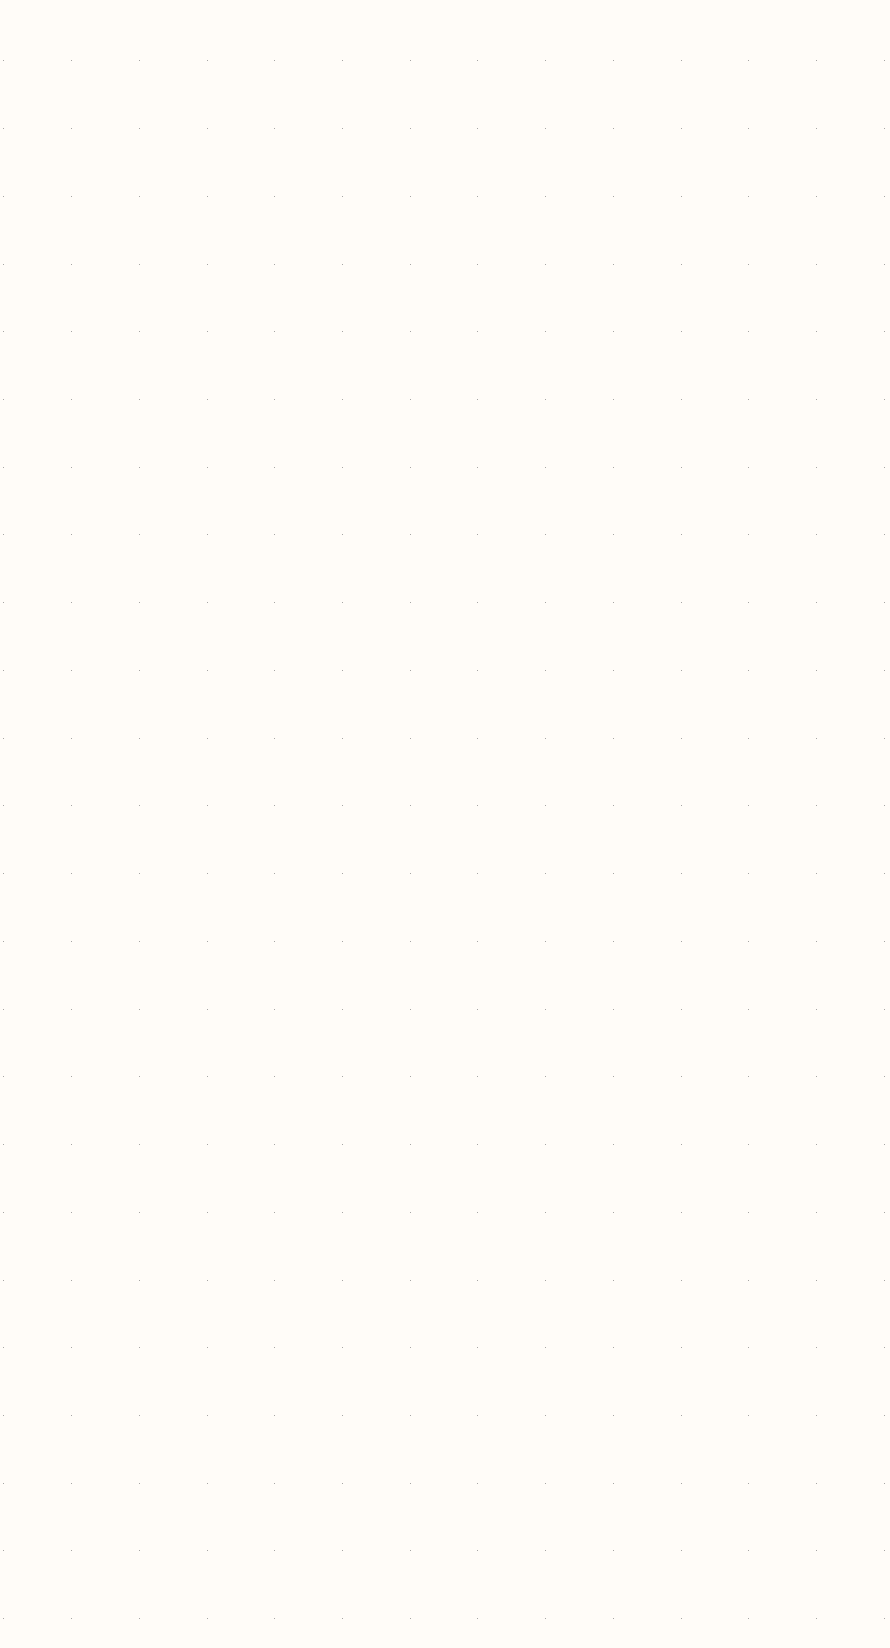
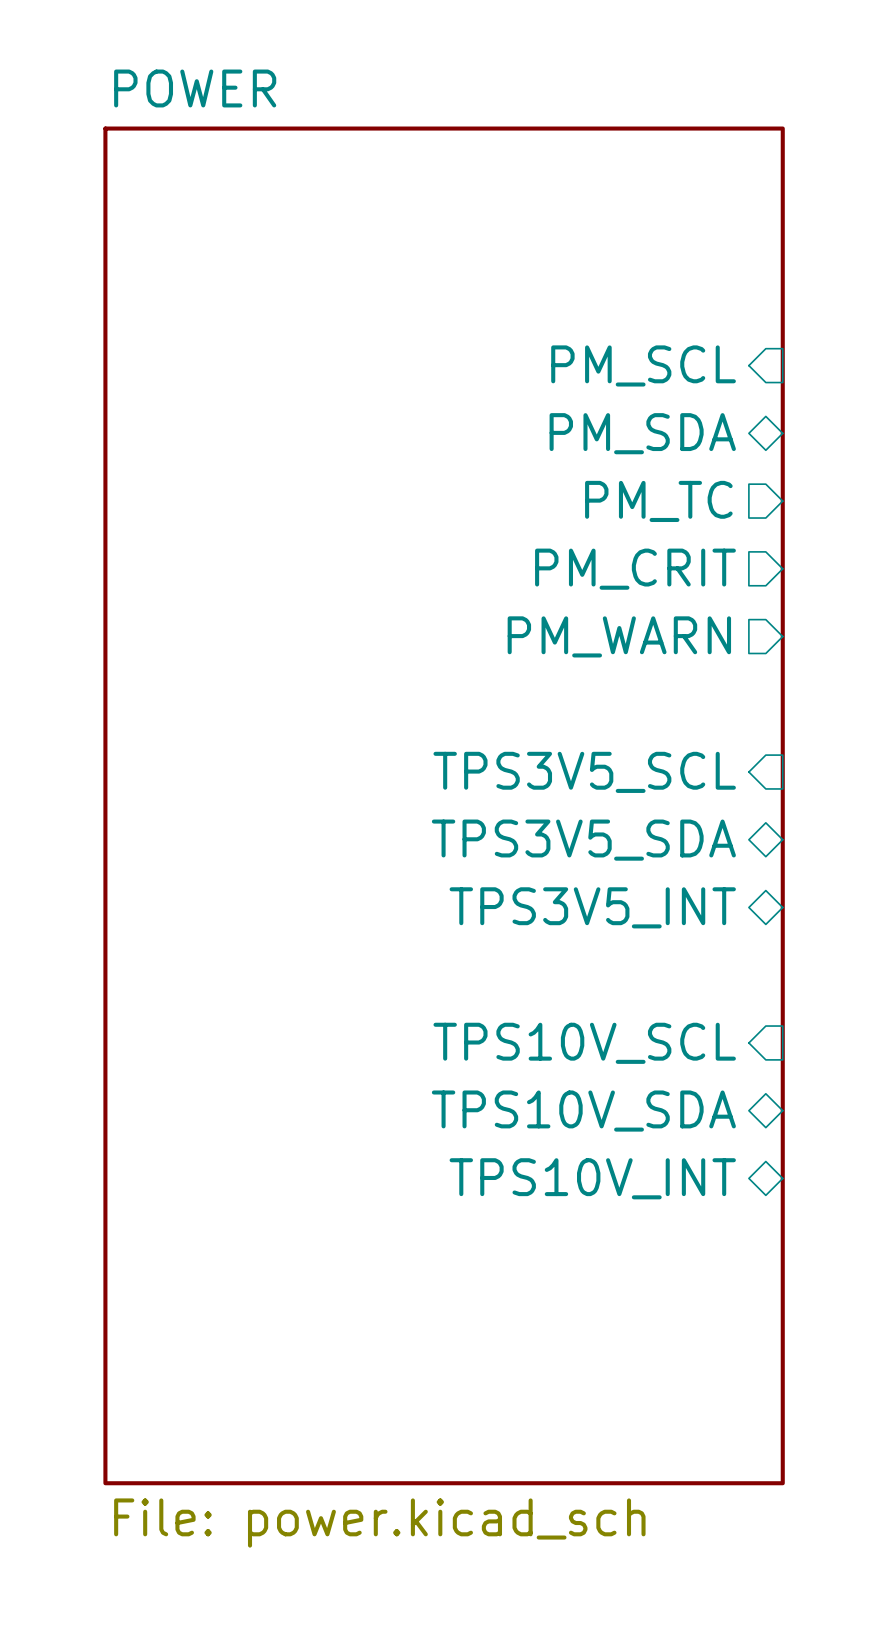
sheet pin: none -> PM_SCL (643, 365)
sheet pin: none -> PM_SDA (642, 433)
sheet pin: none -> PM_TC (658, 501)
sheet pin: none -> PM_CRIT (635, 569)
sheet pin: none -> PM_WARN (619, 636)
sheet pin: none -> TPS3V5_SCL (584, 772)
sheet POWER: none -> File: power.kicad_sch (444, 805)
sheet pin: none -> TPS3V5_SDA (583, 840)
sheet pin: none -> TPS3V5_INT (592, 907)
sheet pin: none -> TPS10V_SCL (584, 1043)
sheet pin: none -> TPS10V_SDA (583, 1111)
sheet pin: none -> TPS10V_INT (592, 1178)

